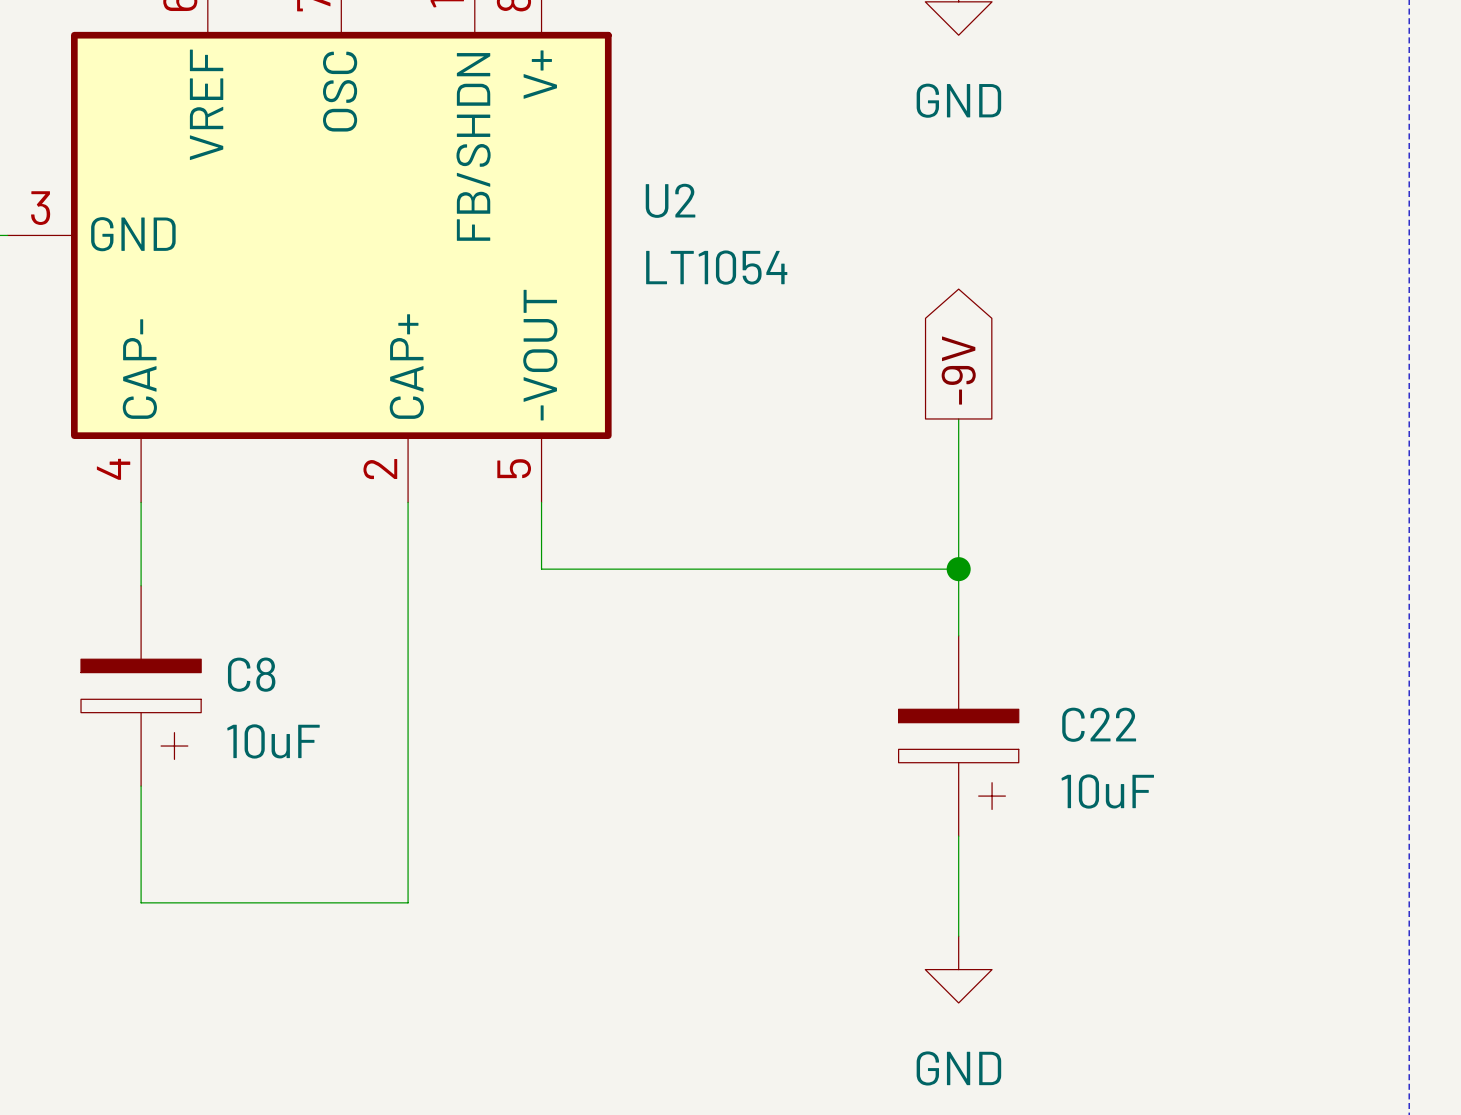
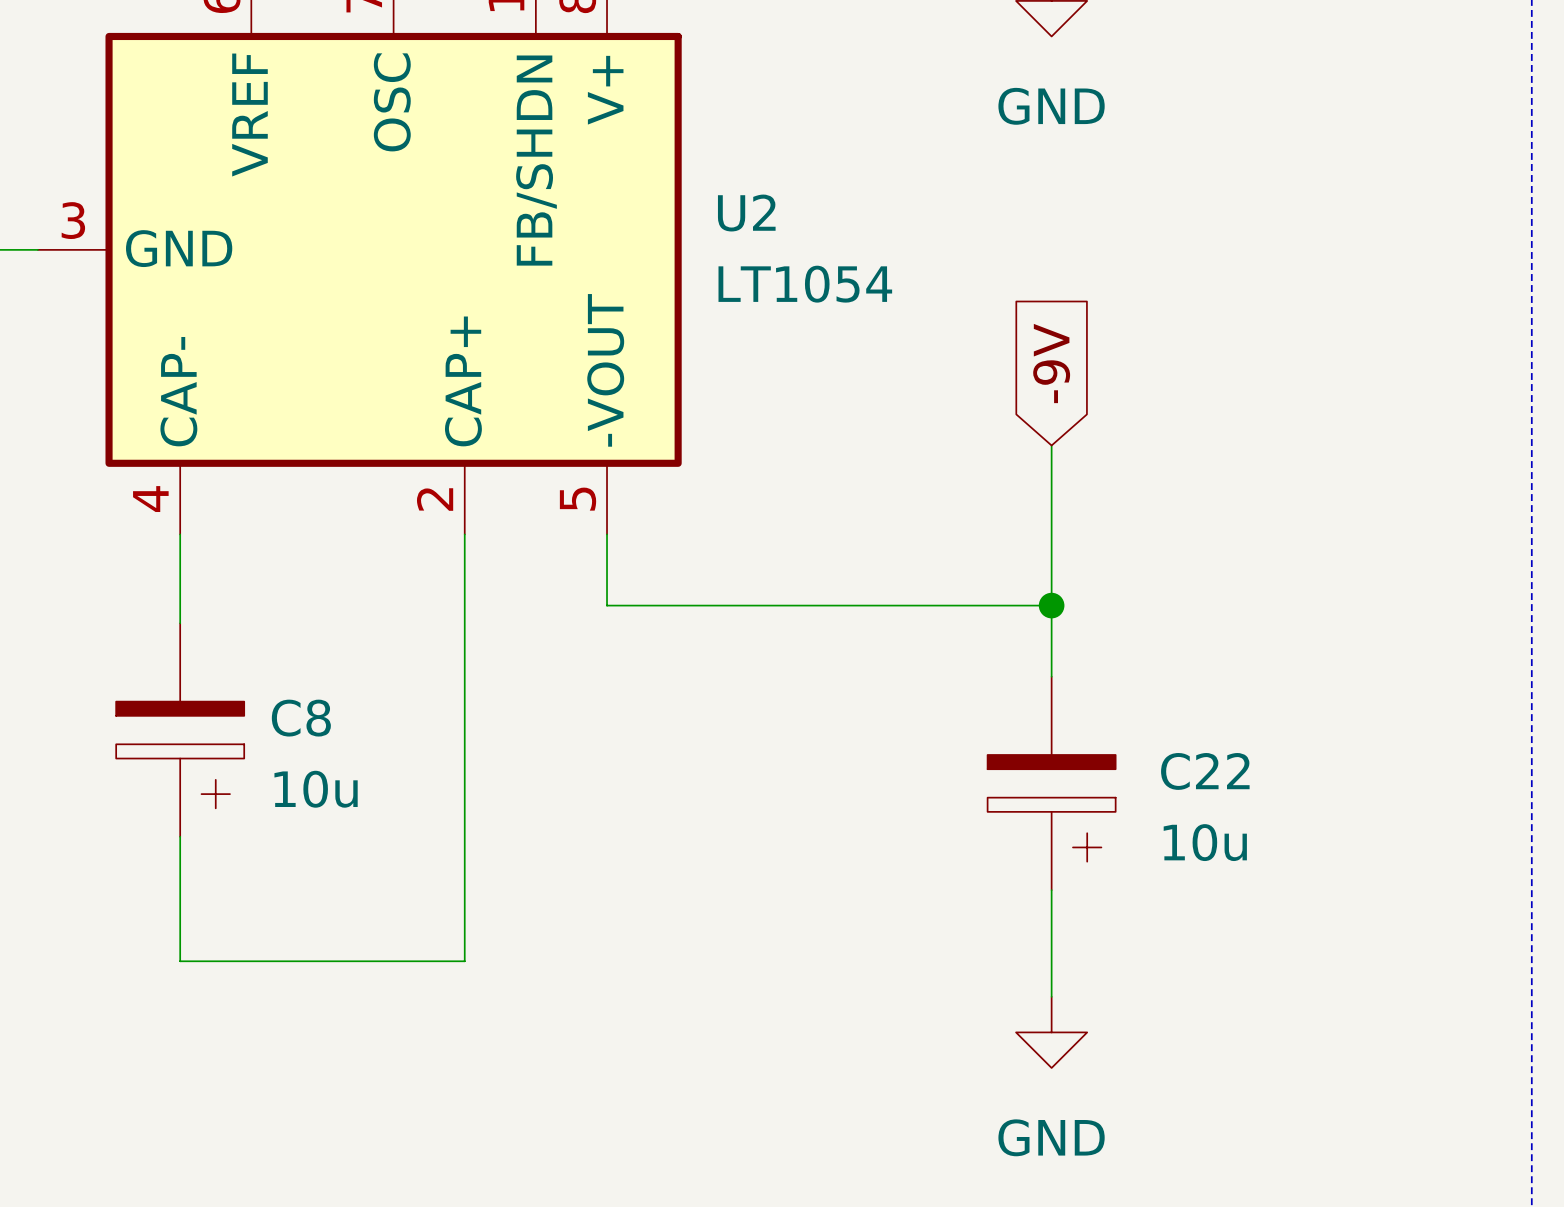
global label shape: output (958, 370) -> input (1051, 363)
C8 value: 10uF (273, 741) -> 10u (316, 789)
C22 value: 10uF (1107, 791) -> 10u (1205, 842)

